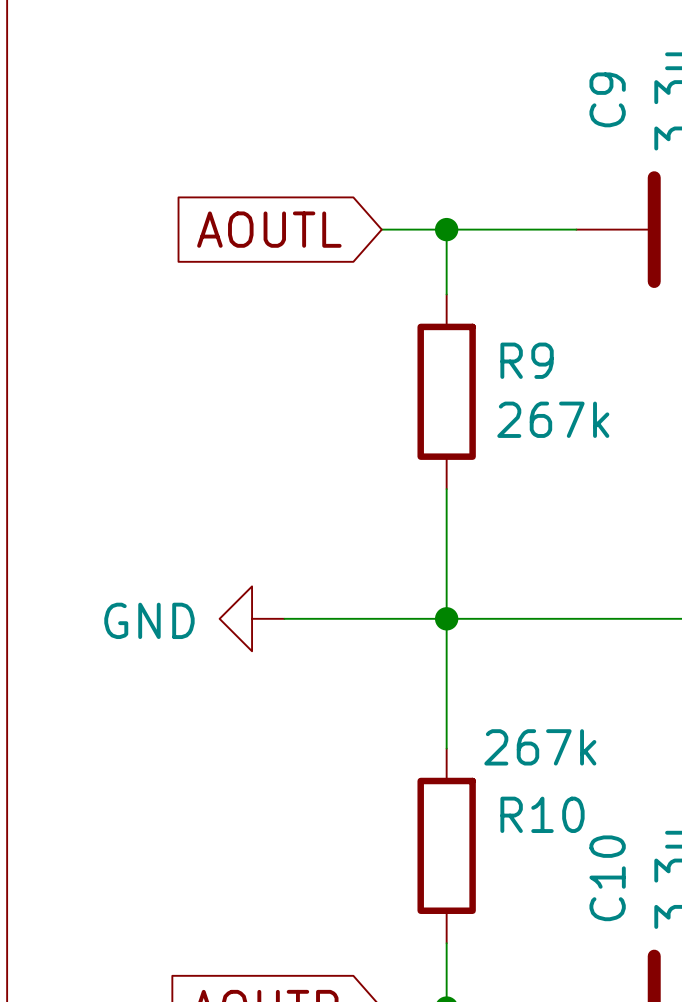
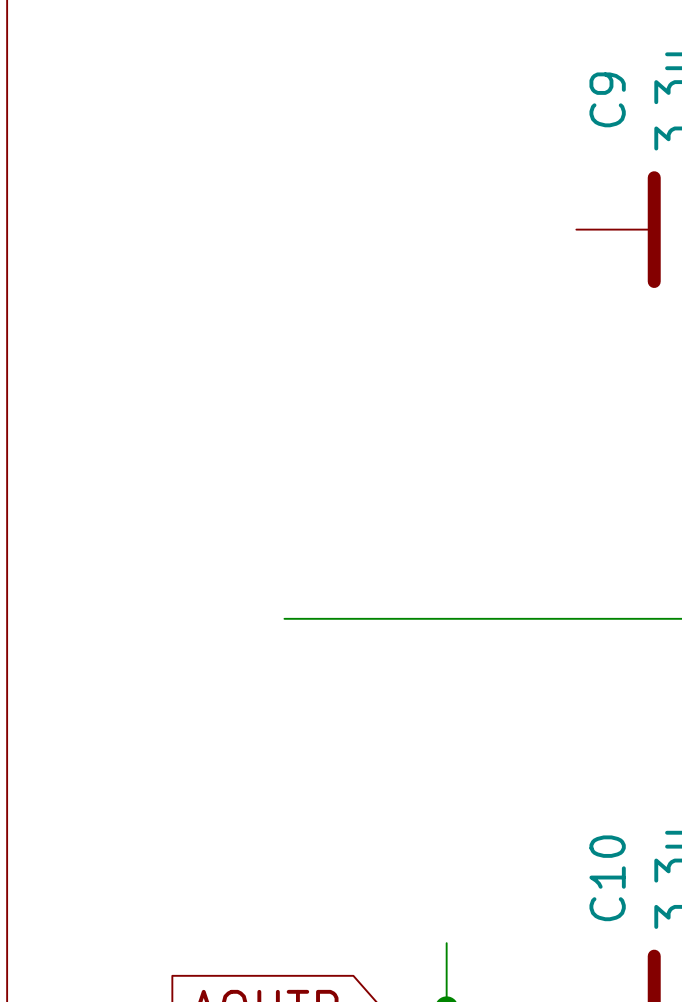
global label: AOUTL (269, 229) -> none
wire: (381, 229) (576, 229) -> none
wire: (446, 229) (446, 294) -> none
junction: (446, 229) -> none
R9: 267k (446, 391) -> none
wire: (446, 489) (446, 748) -> none
power symbol: GND (252, 618) -> none
junction: (446, 618) -> none
R10: 267k (446, 845) -> none

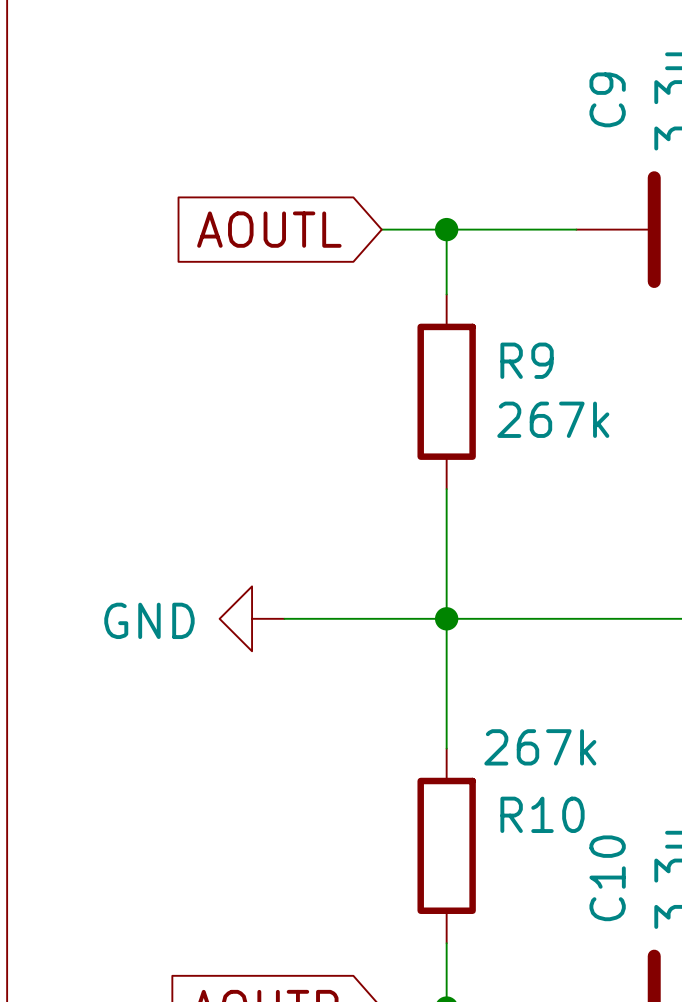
global label: none -> AOUTL (269, 229)
wire: none -> (381, 229) (576, 229)
wire: none -> (446, 229) (446, 294)
junction: none -> (446, 229)
R9: none -> 267k (446, 391)
wire: none -> (446, 489) (446, 748)
power symbol: none -> GND (252, 618)
junction: none -> (446, 618)
R10: none -> 267k (446, 845)

